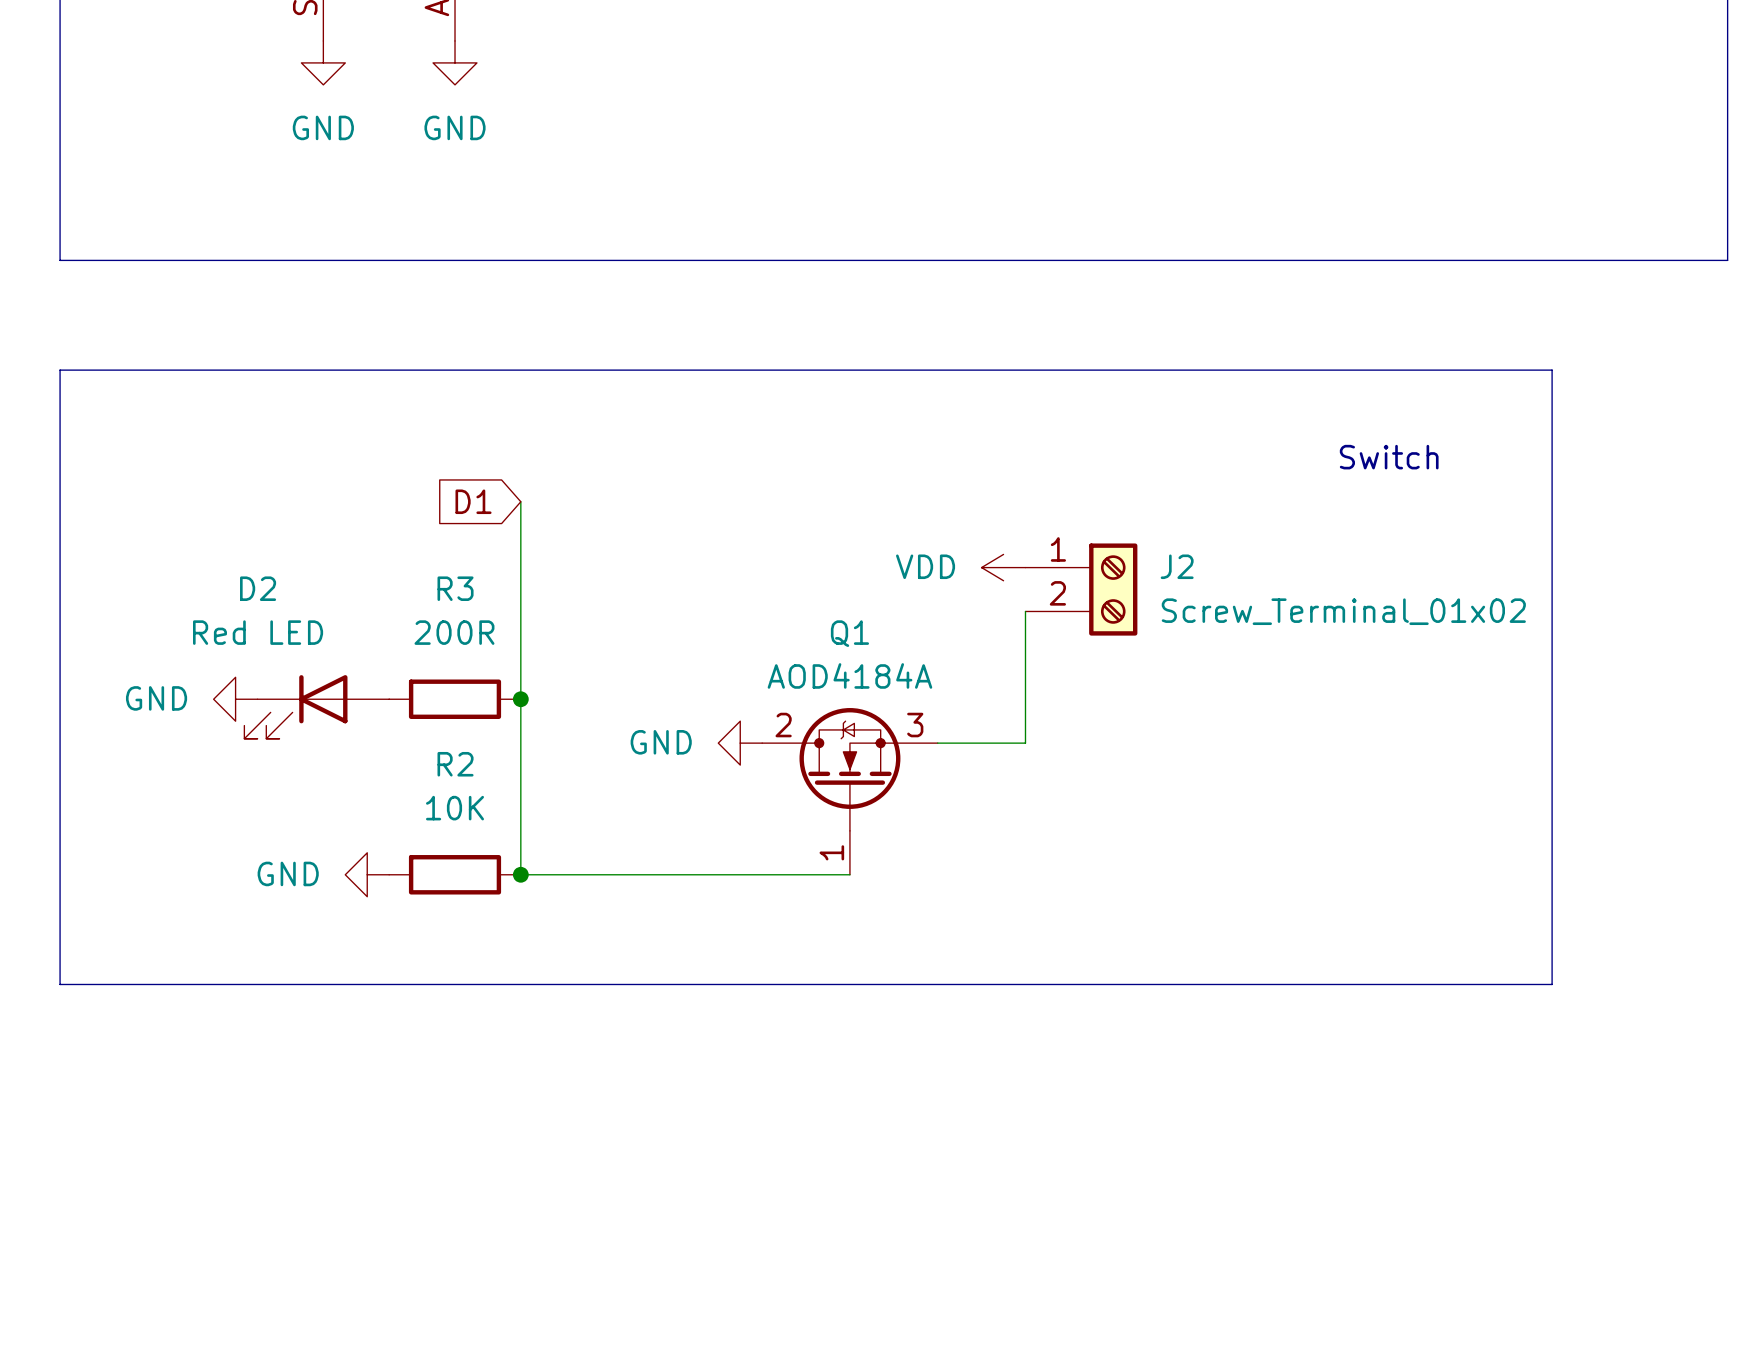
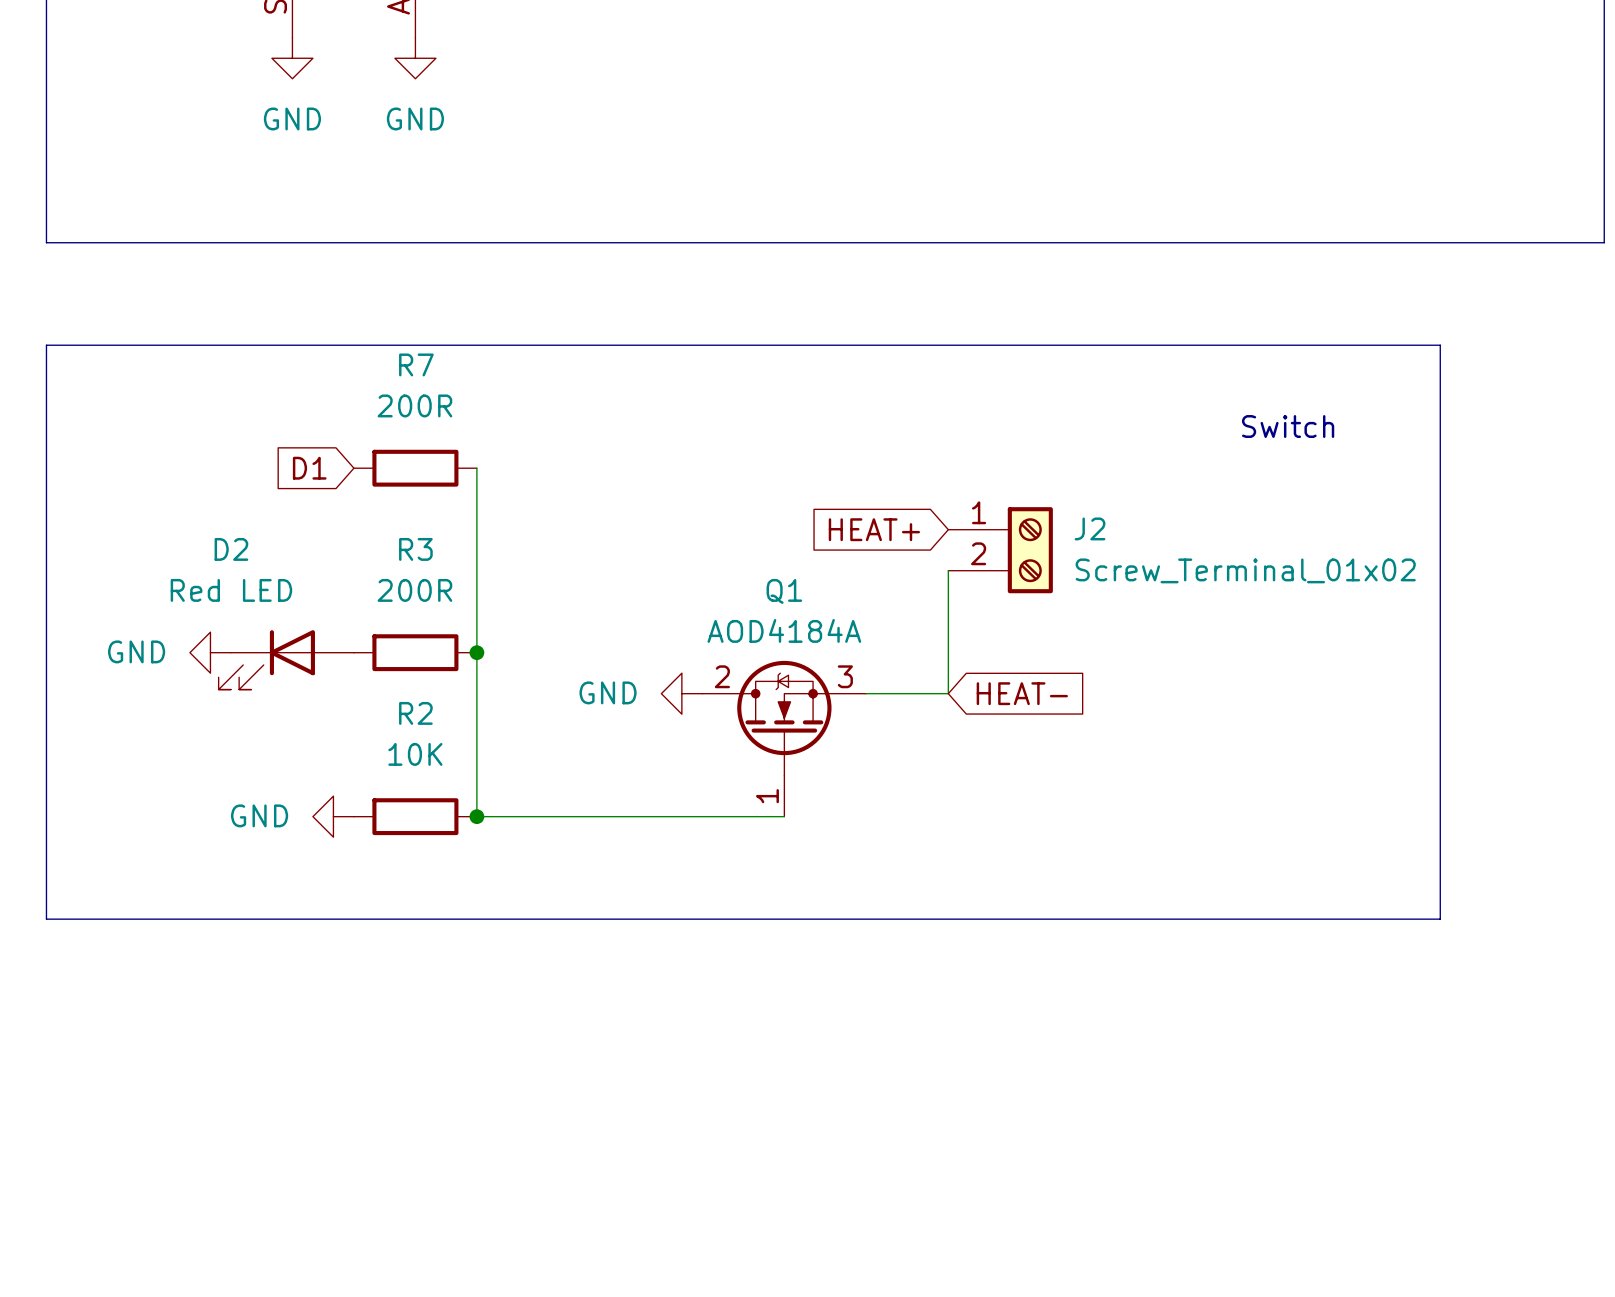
R7: none -> 200R (415, 468)
global label position: D1 (473, 501) -> D1 (309, 468)
global label: none -> HEAT+ (874, 529)
power symbol: VDD (1003, 567) -> none
global label: none -> HEAT- (1022, 693)

